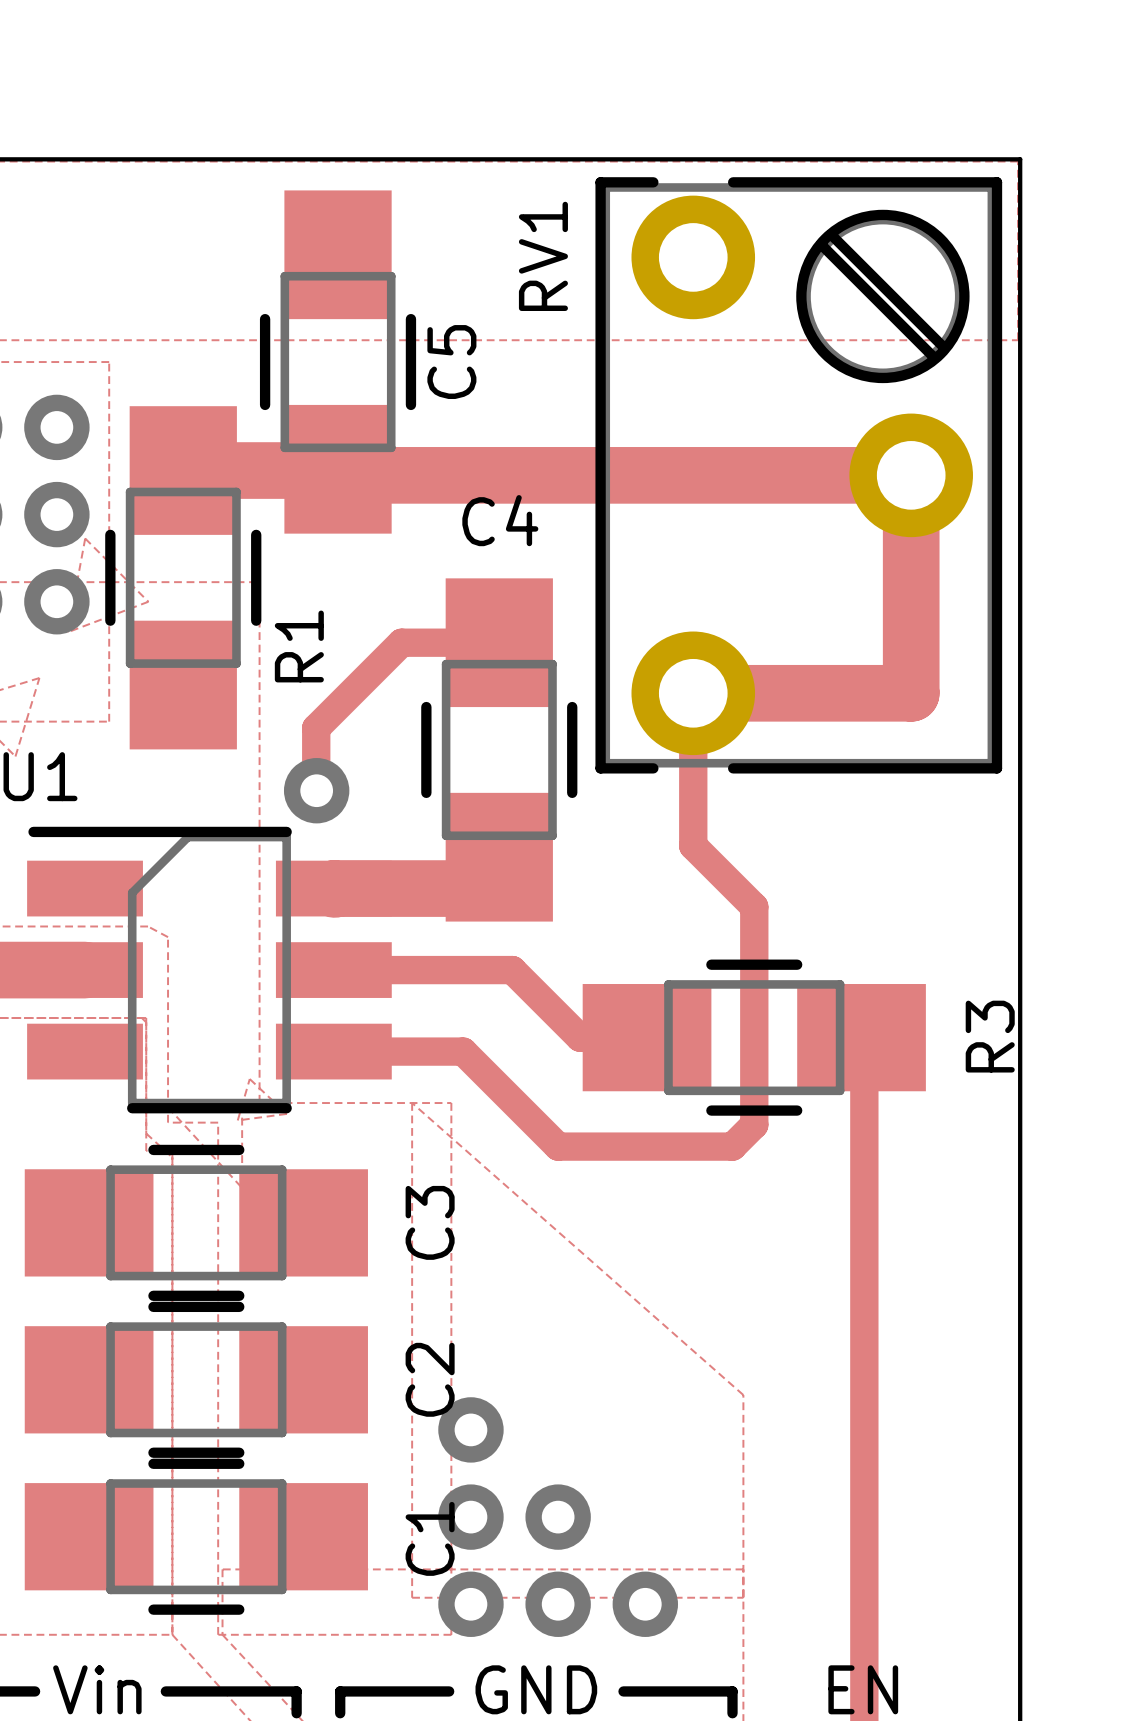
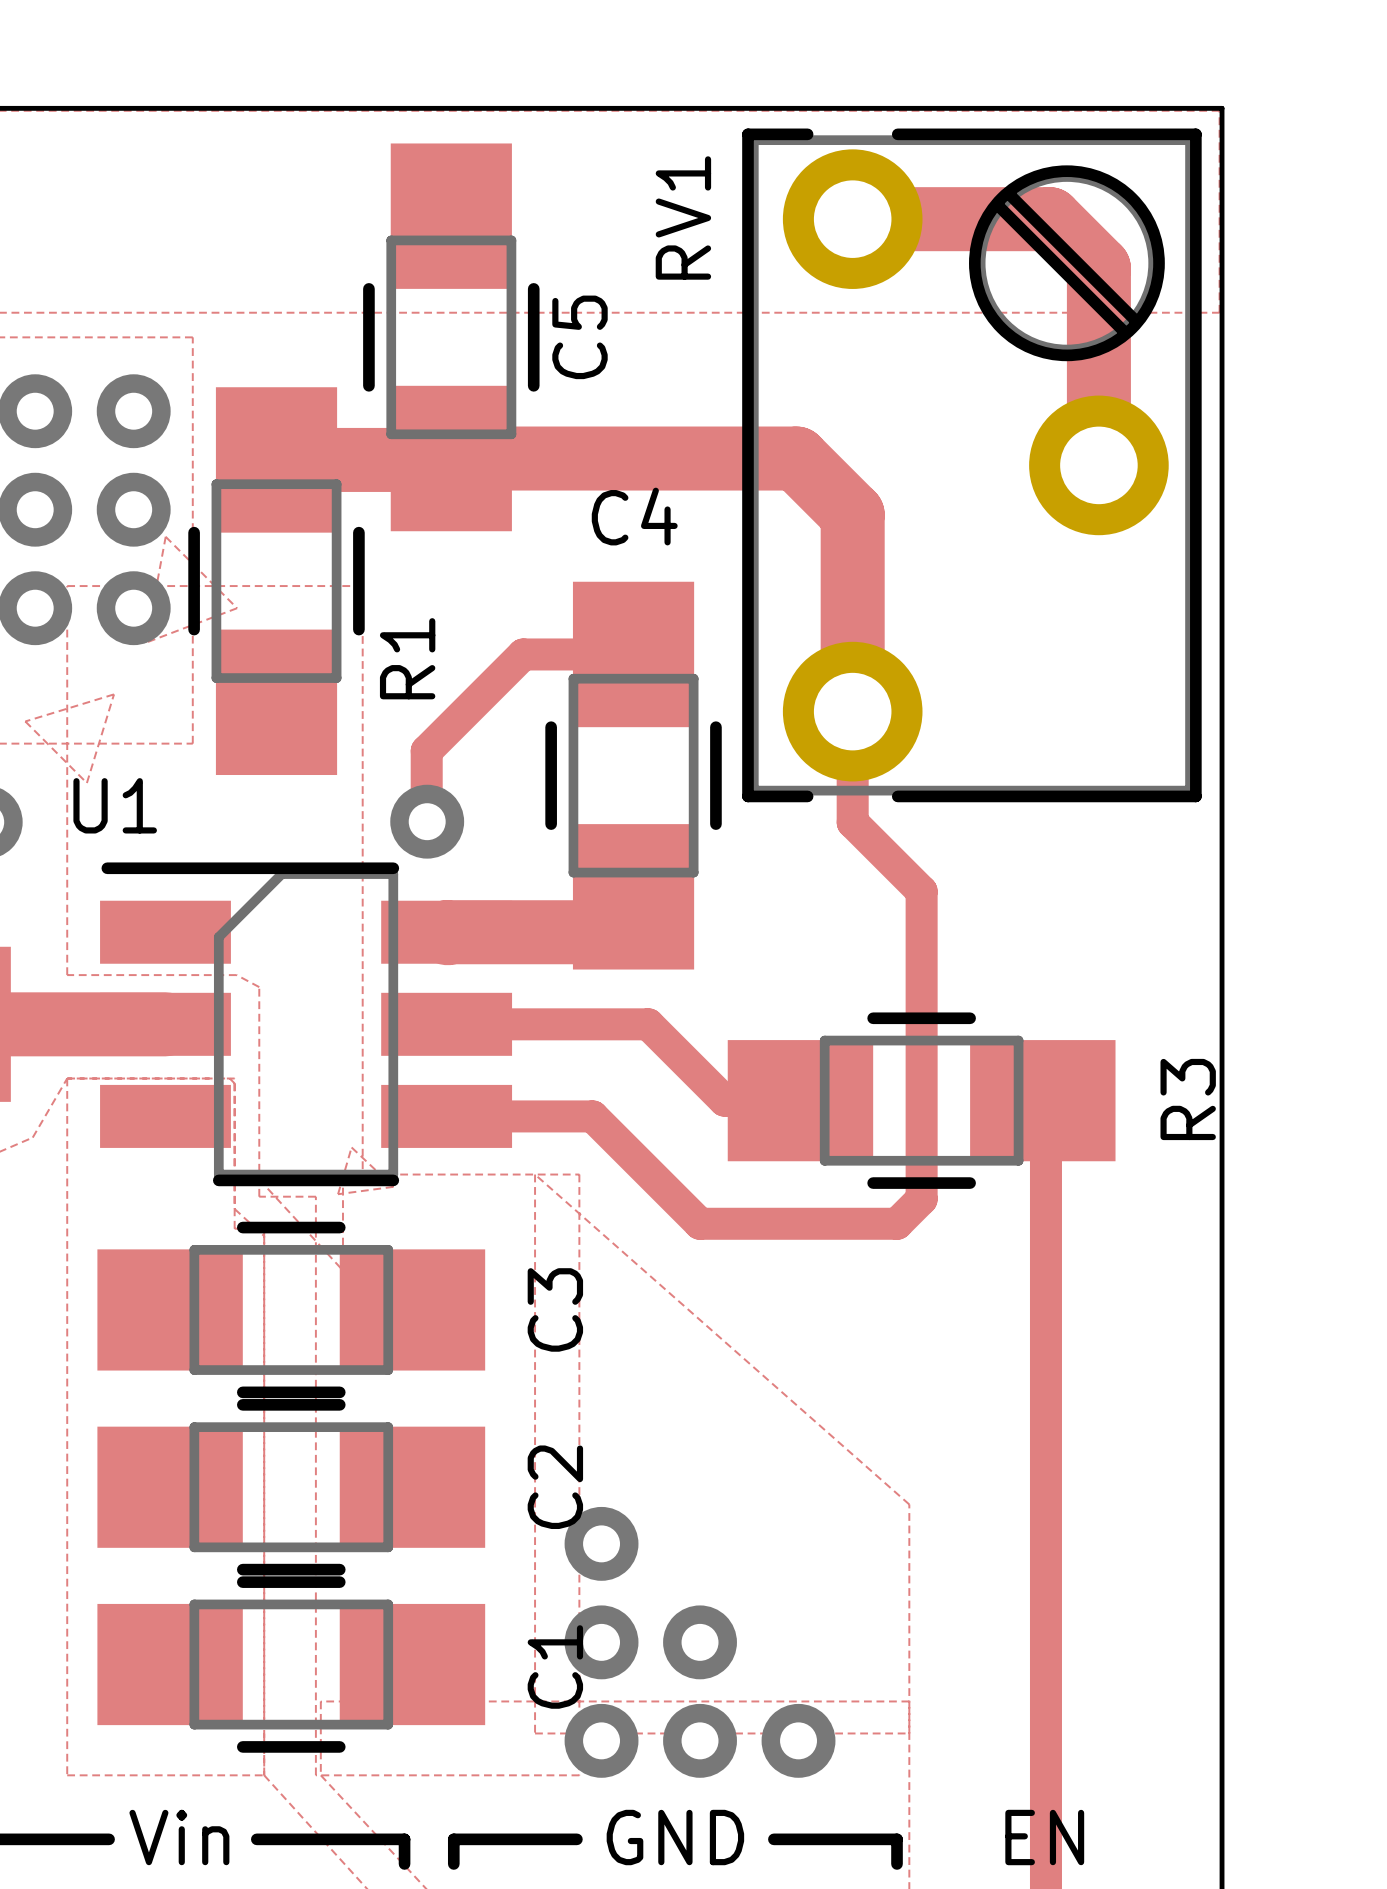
track: none -> (852, 219) (1049, 219) (1098, 268) (1098, 465)
track: (338, 469) (344, 475) (911, 475) (911, 693) (693, 693) -> (451, 458) (796, 458) (852, 514) (852, 711)
track: (693, 791) (693, 845) (754, 906) -> (852, 822) (921, 891) (921, 952)

